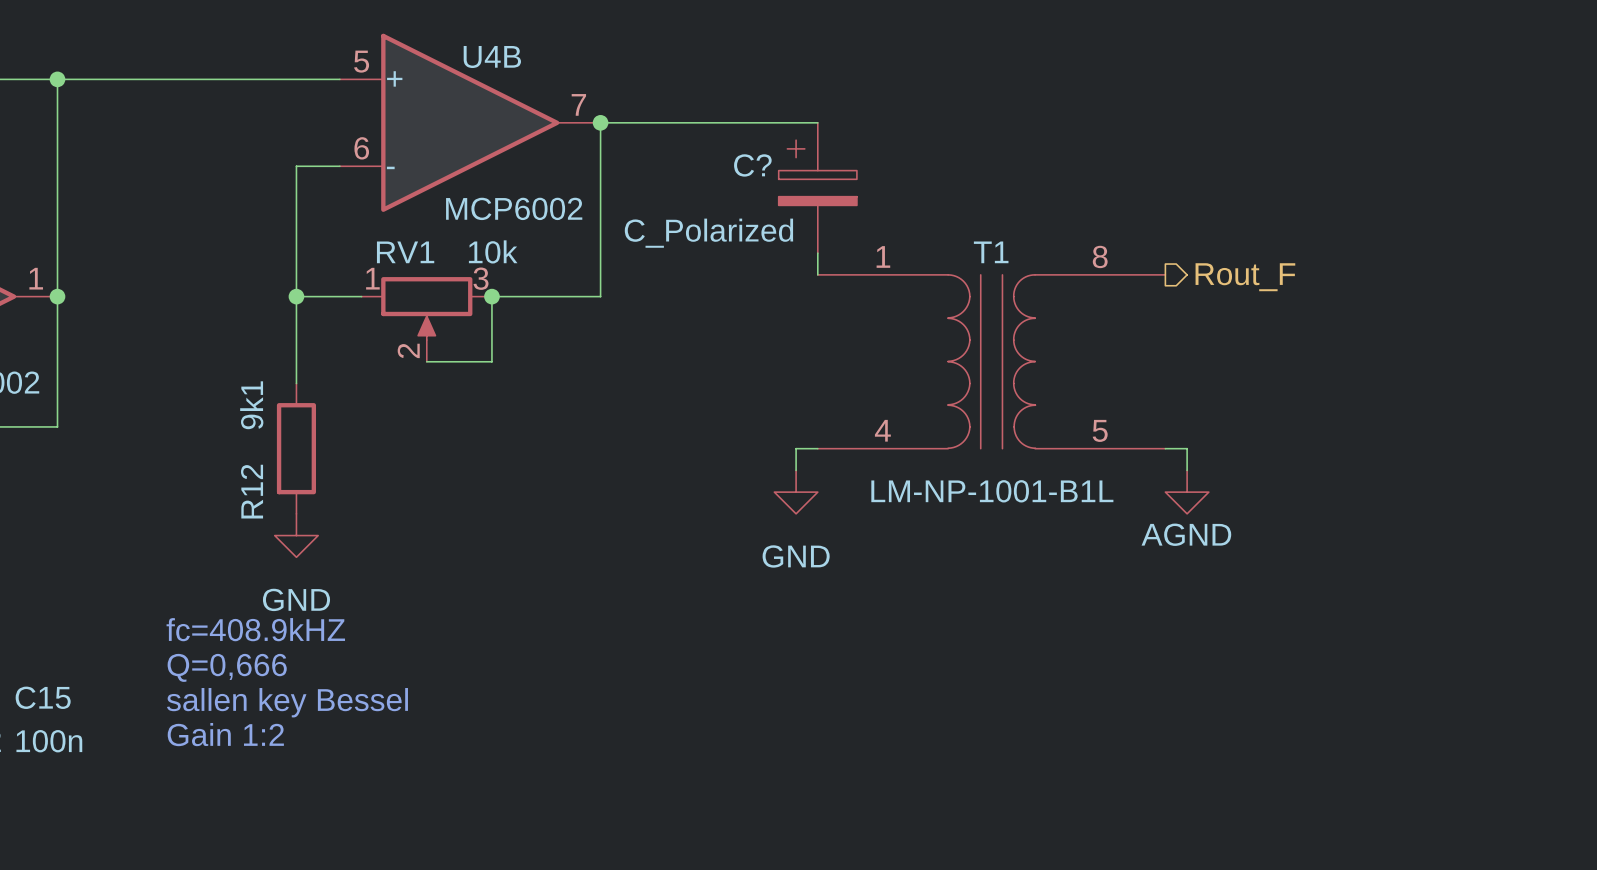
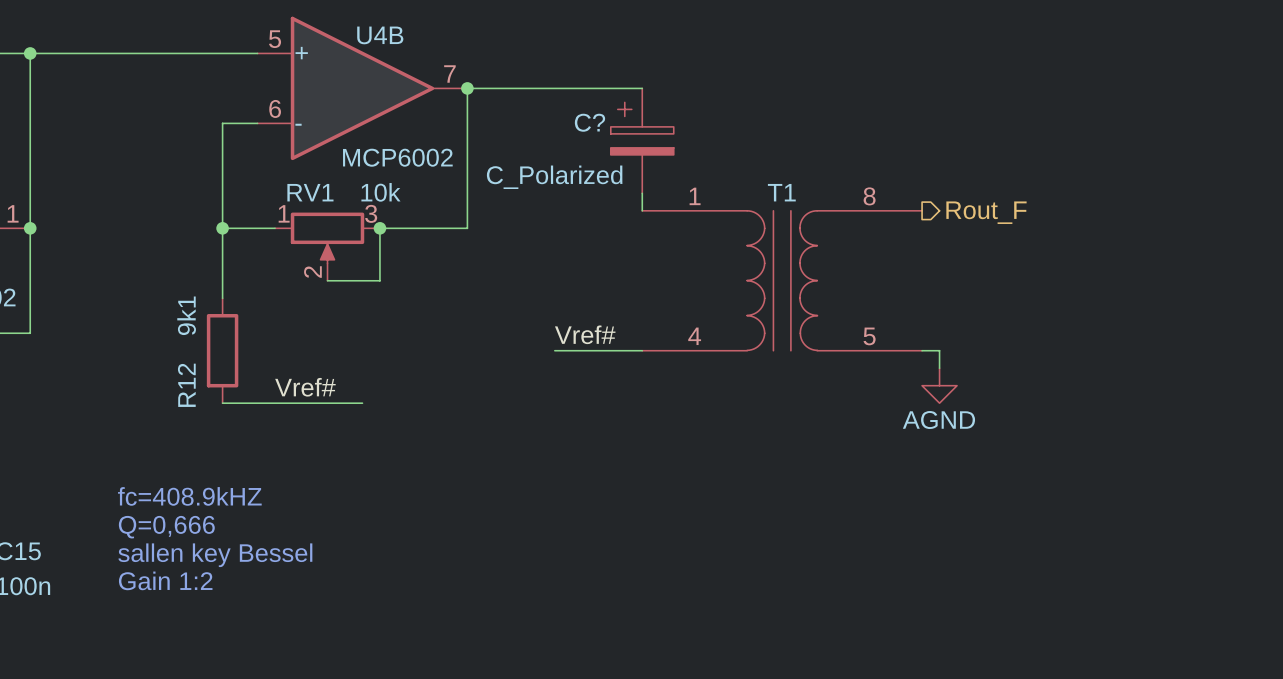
label: none -> Vref# (585, 334)
wire: (796, 448) (796, 470) -> (624, 350) (554, 350)
T1 value: LM-NP-1001-B1L (992, 491) -> none
power symbol: GND (796, 492) -> none
label: none -> Vref# (305, 387)
wire: none -> (222, 403) (362, 403)
power symbol: GND (296, 535) -> none

